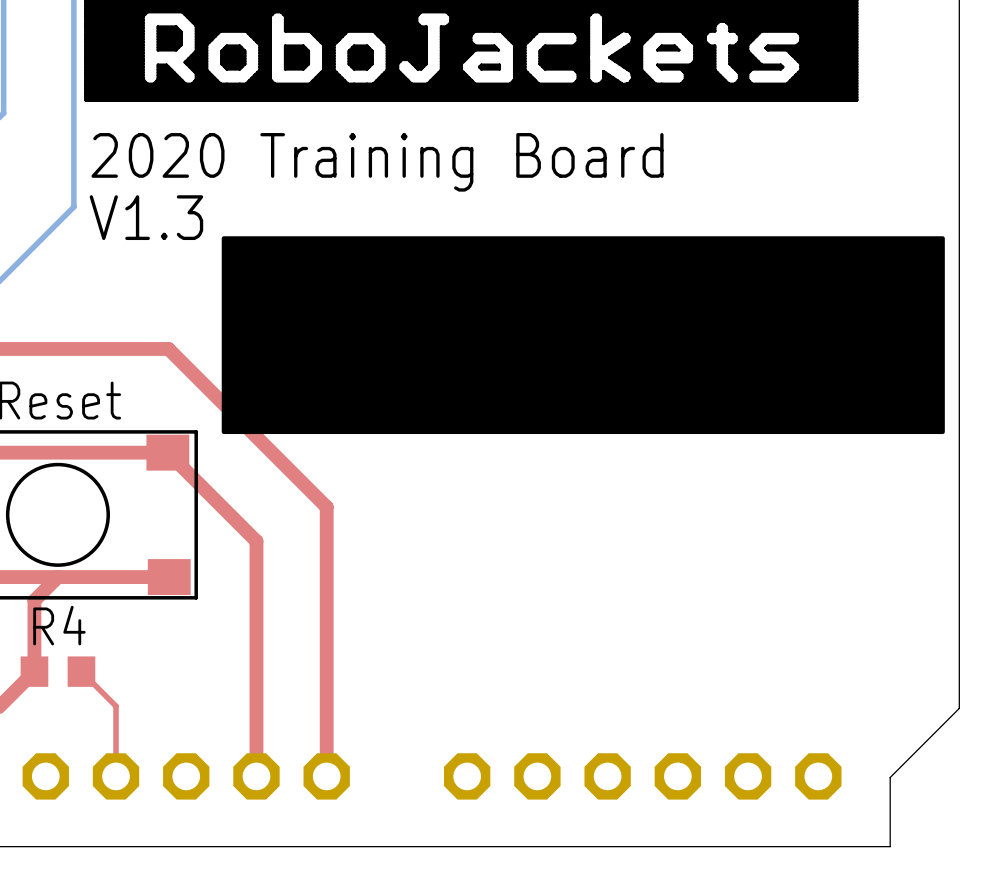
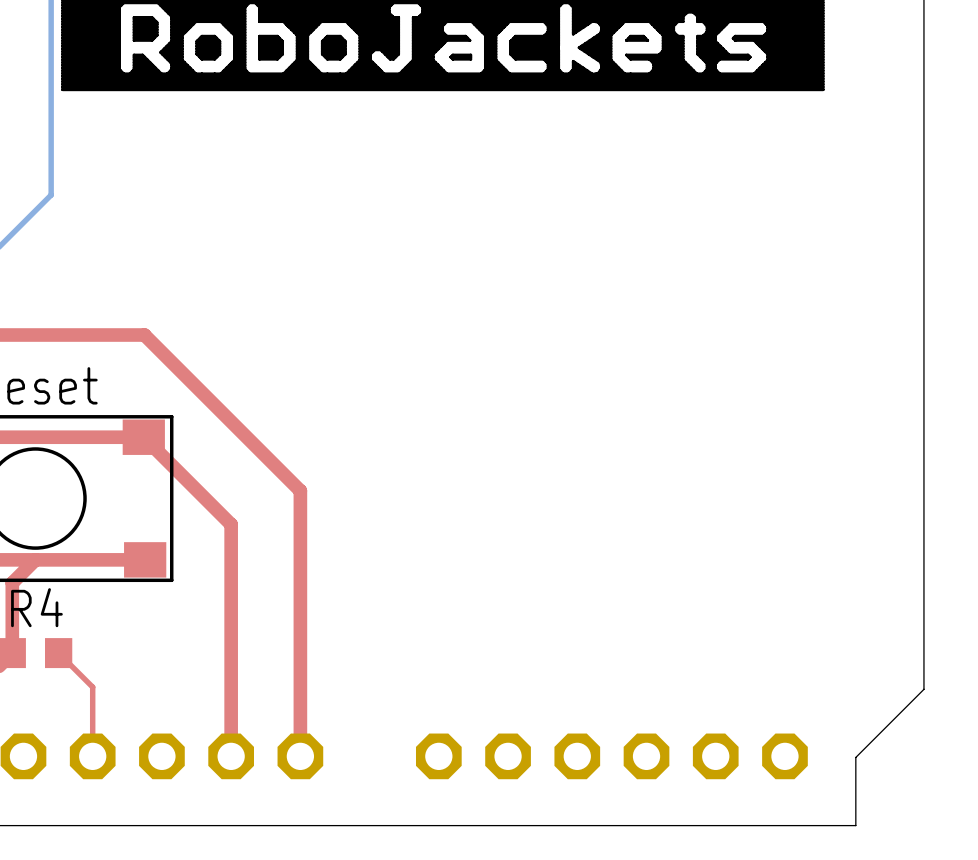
text: 2020 Training Board (377, 162) -> none
text: V1.3 (146, 217) -> none
drawing: [221, 236, 945, 435] -> none

